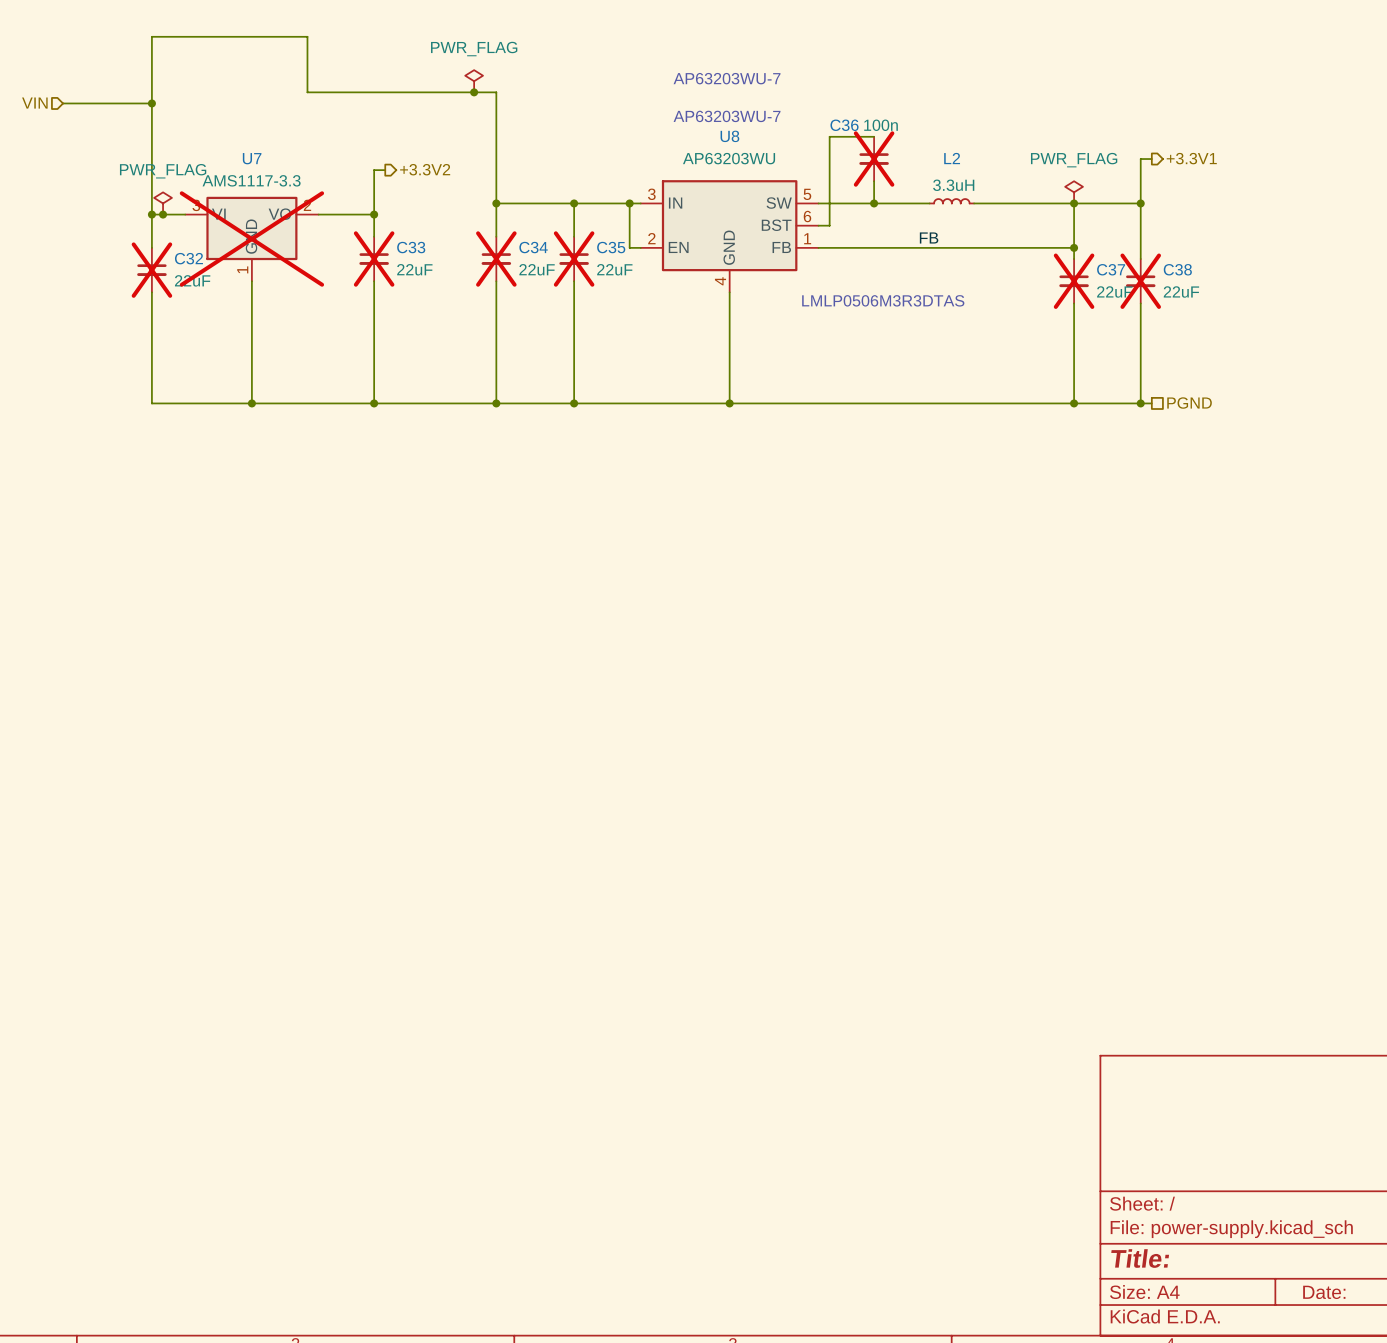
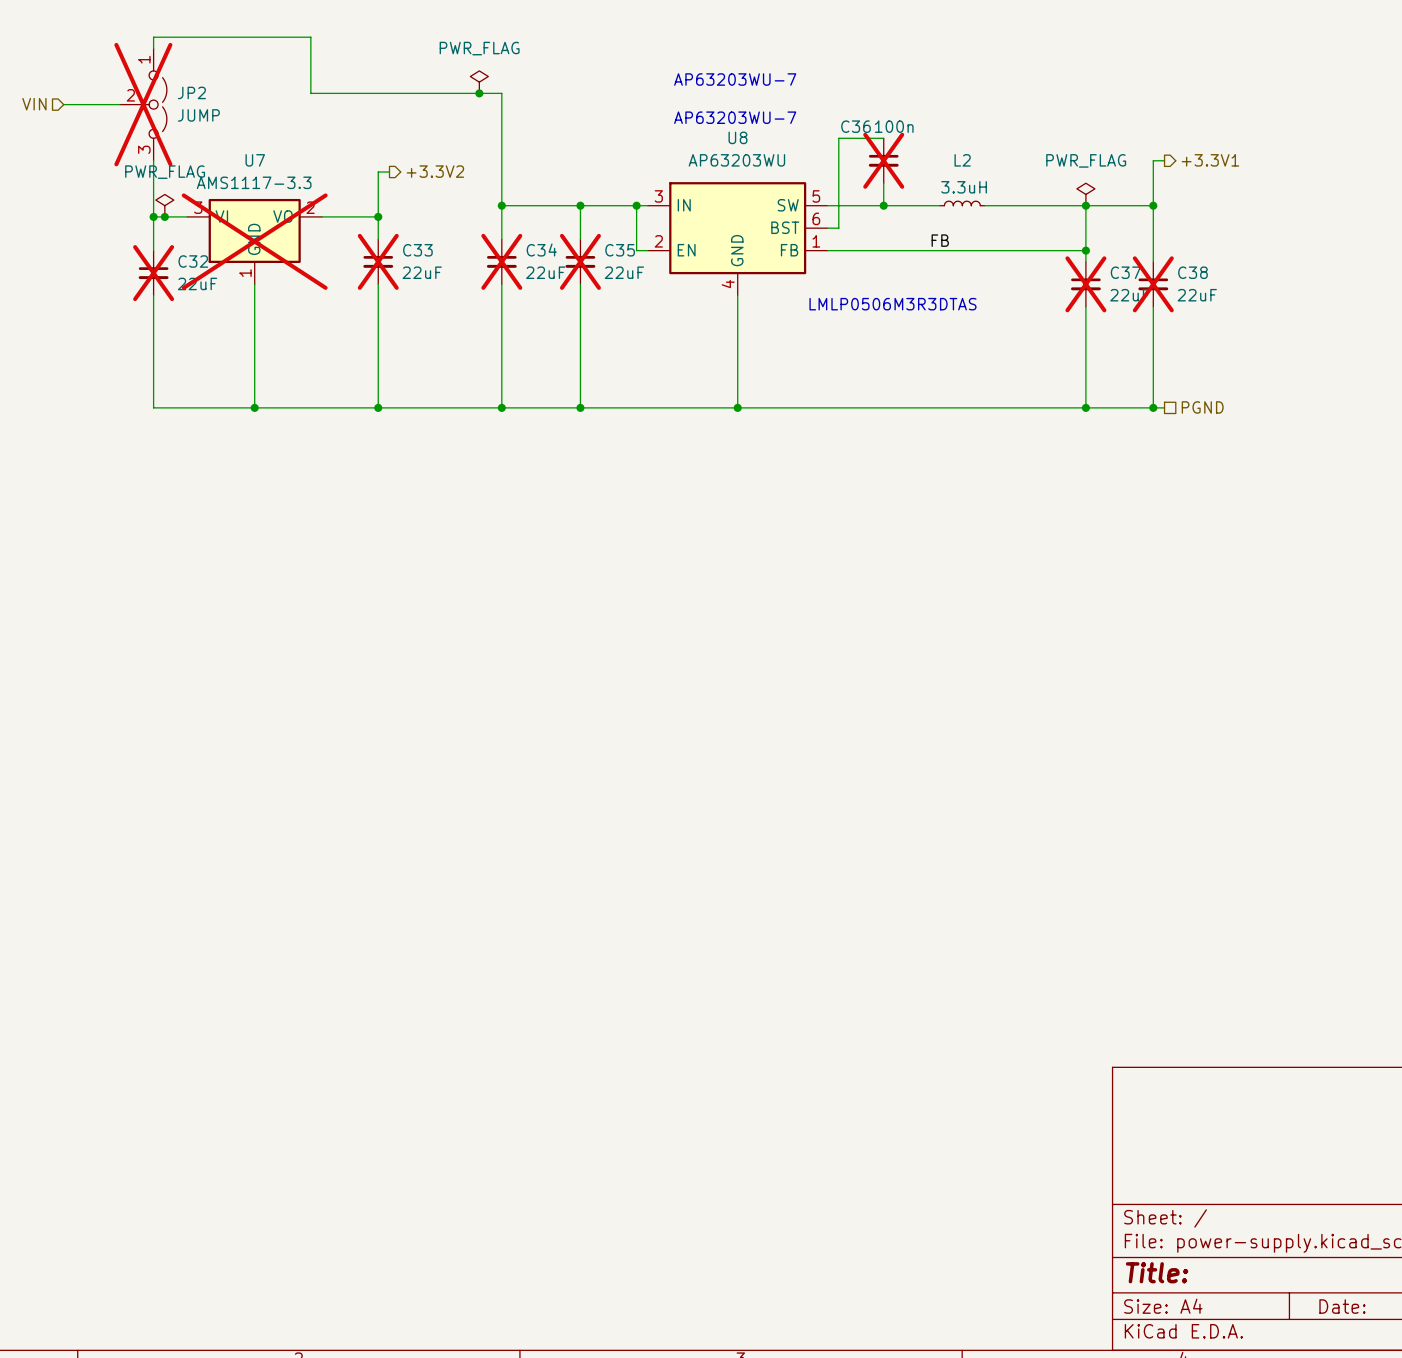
JP2: none -> JUMP (143, 104)
junction: (151, 103) -> none

